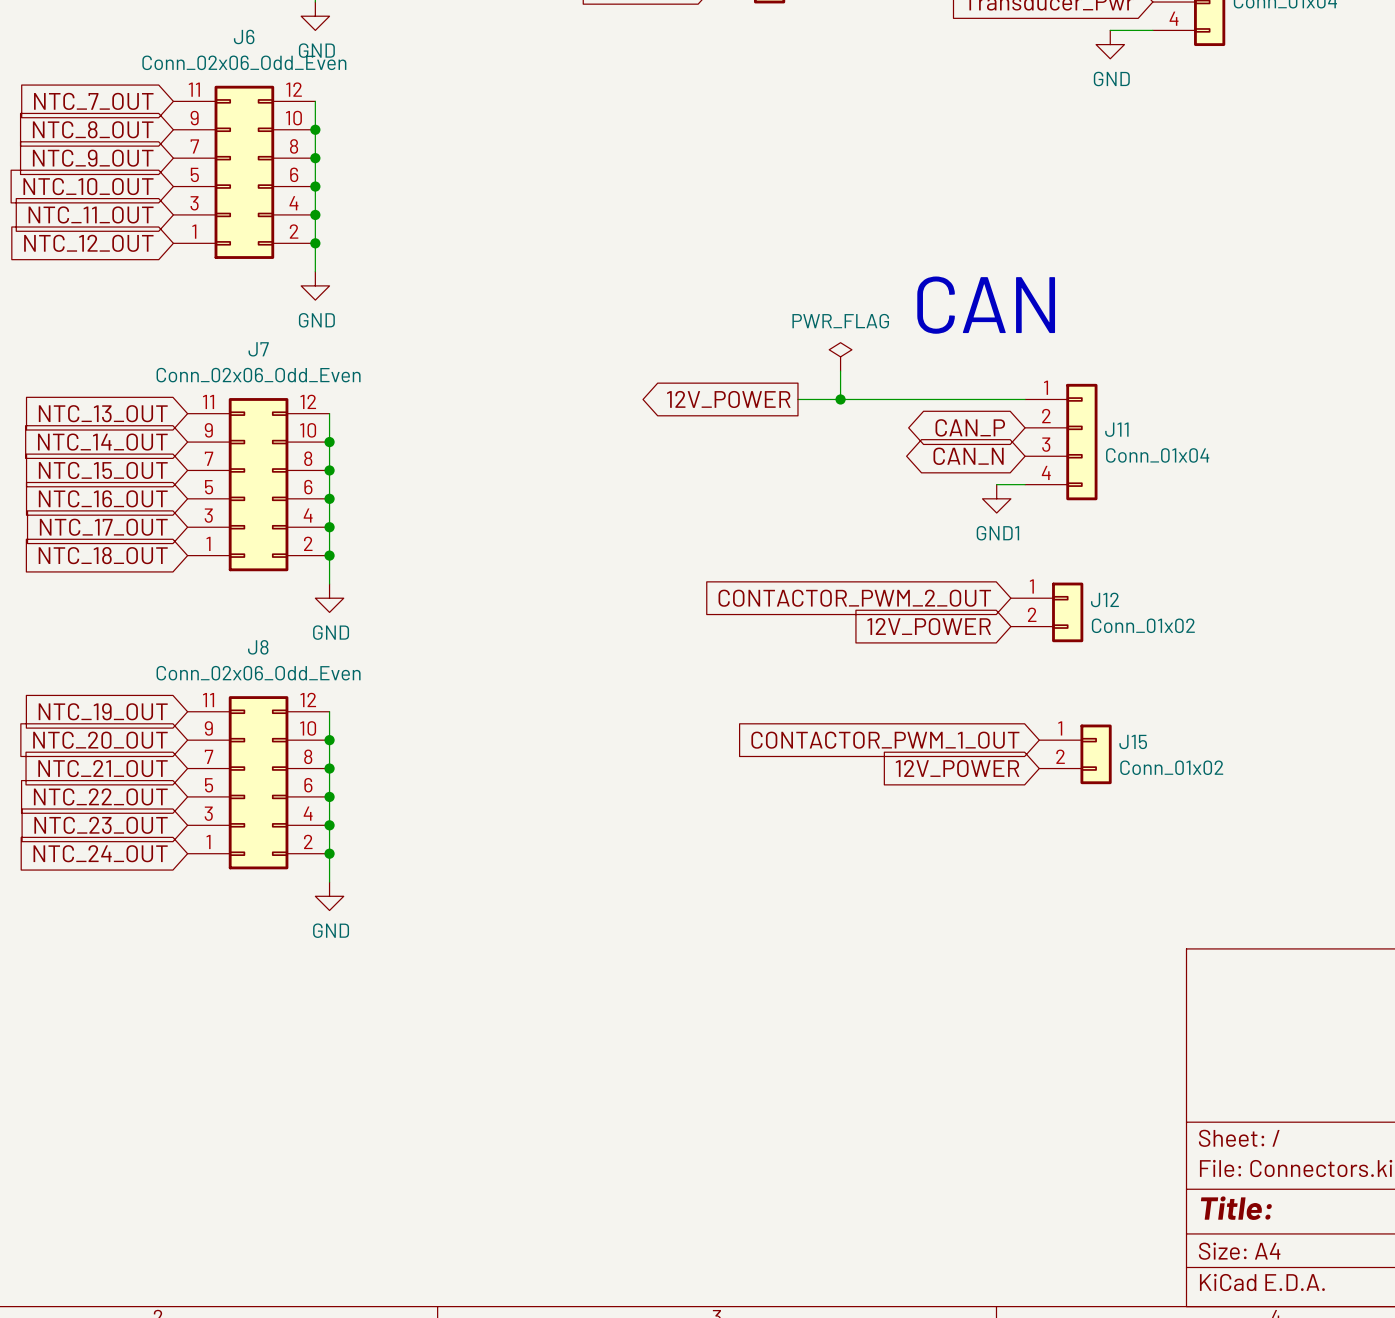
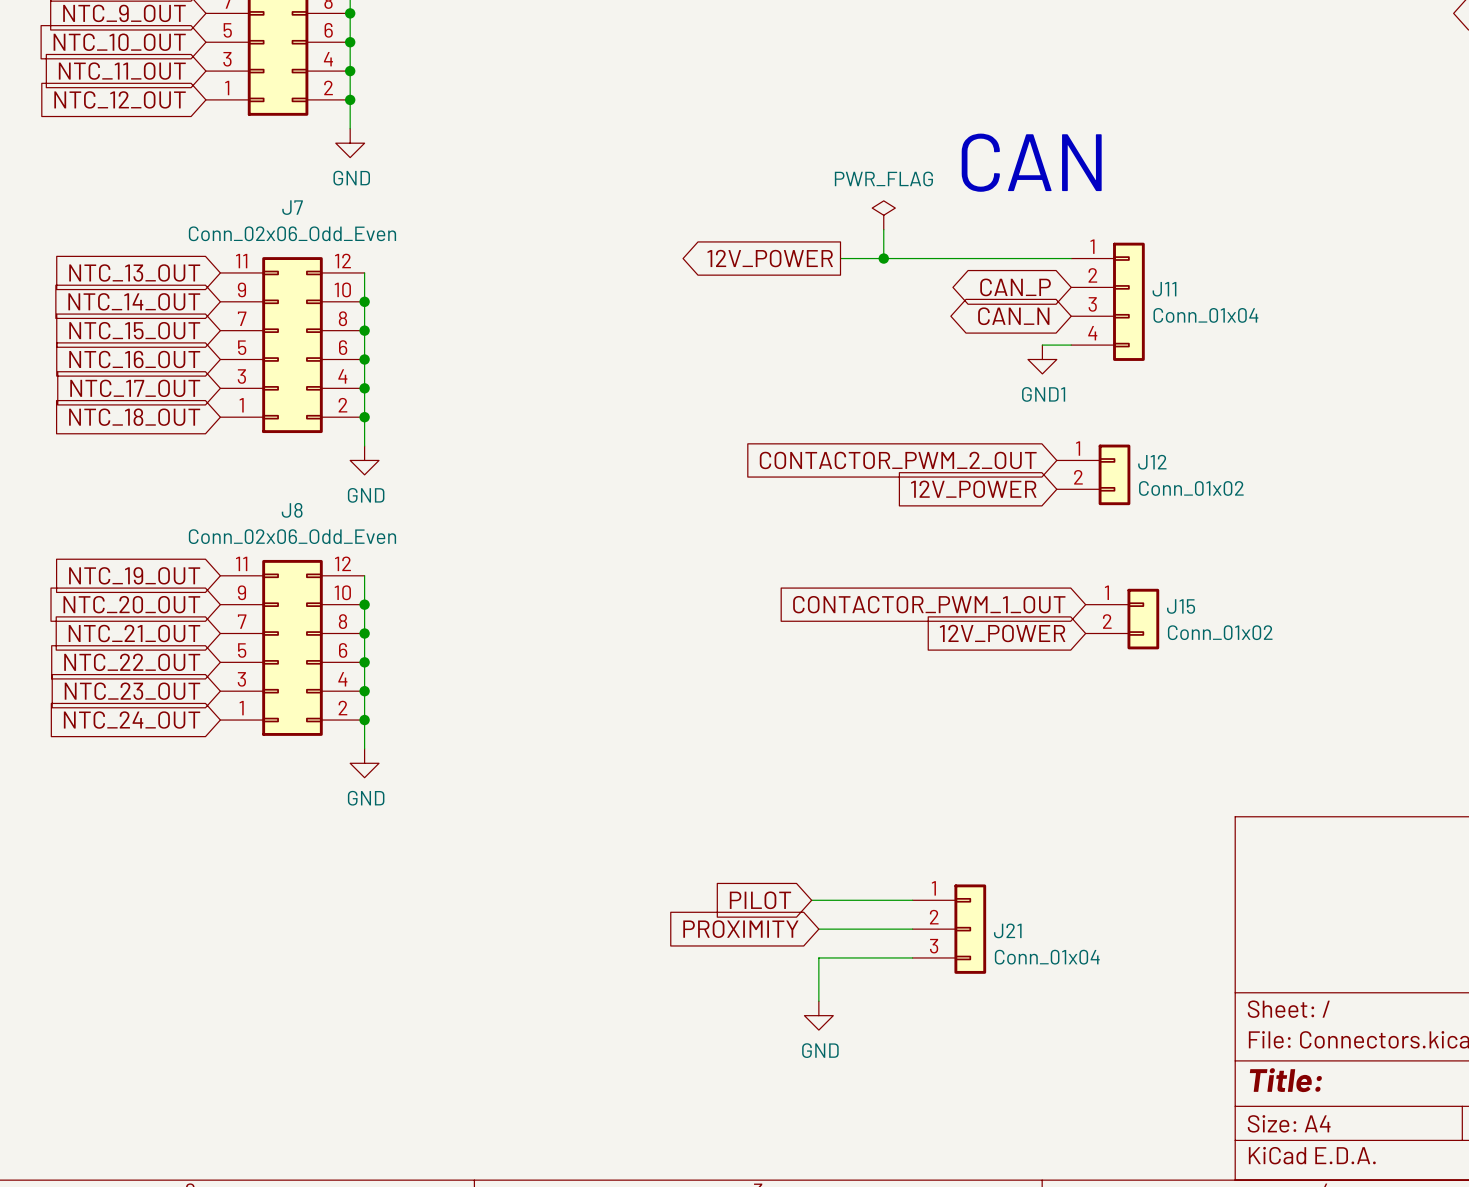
global label: none -> PILOT (760, 900)
wire: none -> (811, 900) (912, 900)
global label: none -> PROXIMITY (740, 929)
wire: none -> (818, 929) (912, 929)
J21: none -> Conn_01x04 (949, 929)
wire: none -> (912, 957) (818, 957) (818, 1001)
power symbol: none -> GND (818, 1015)

